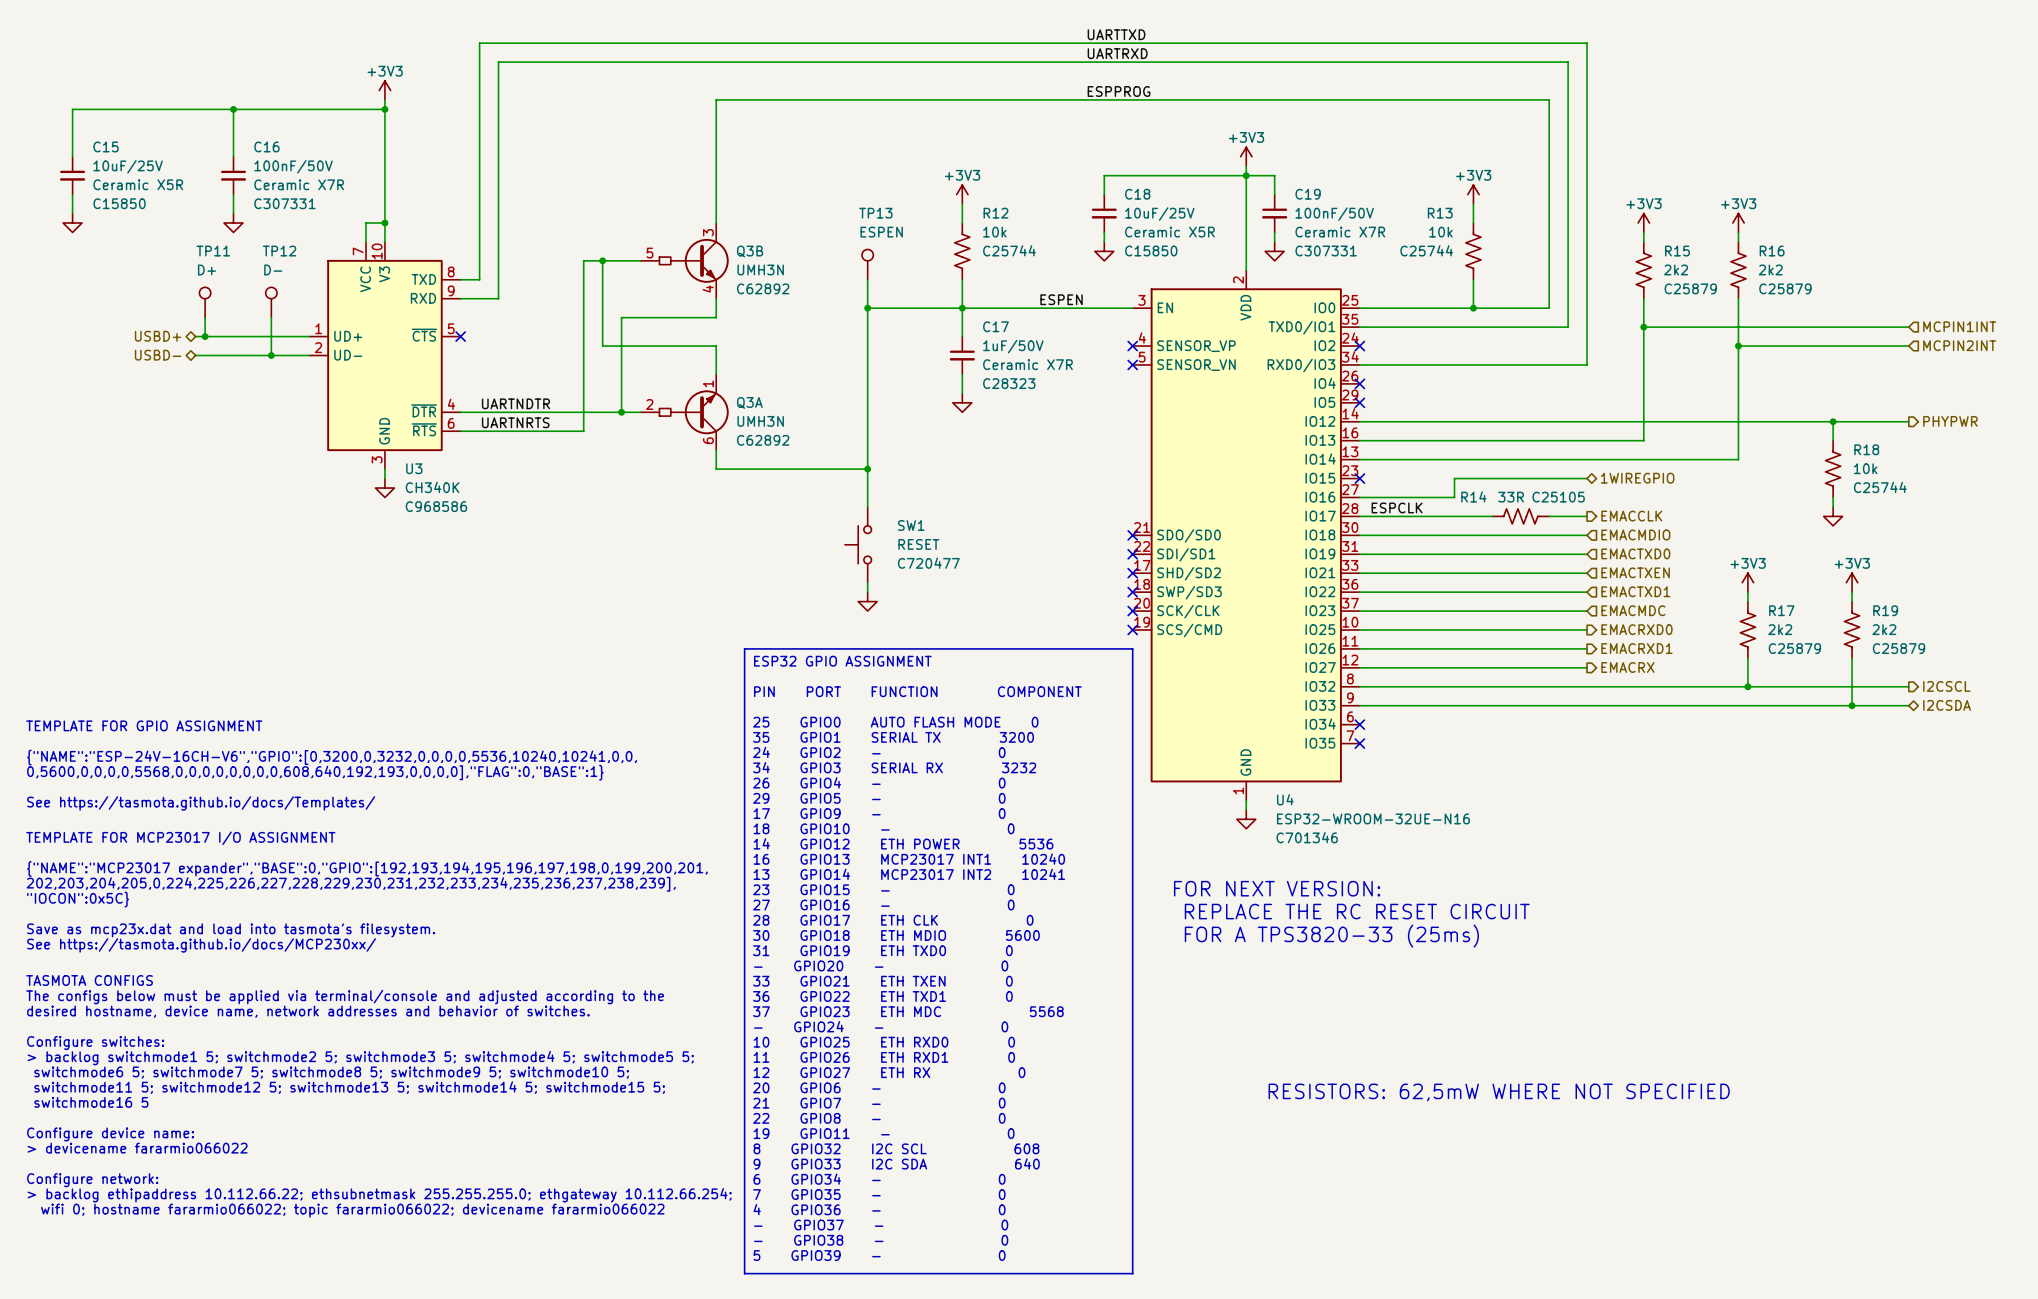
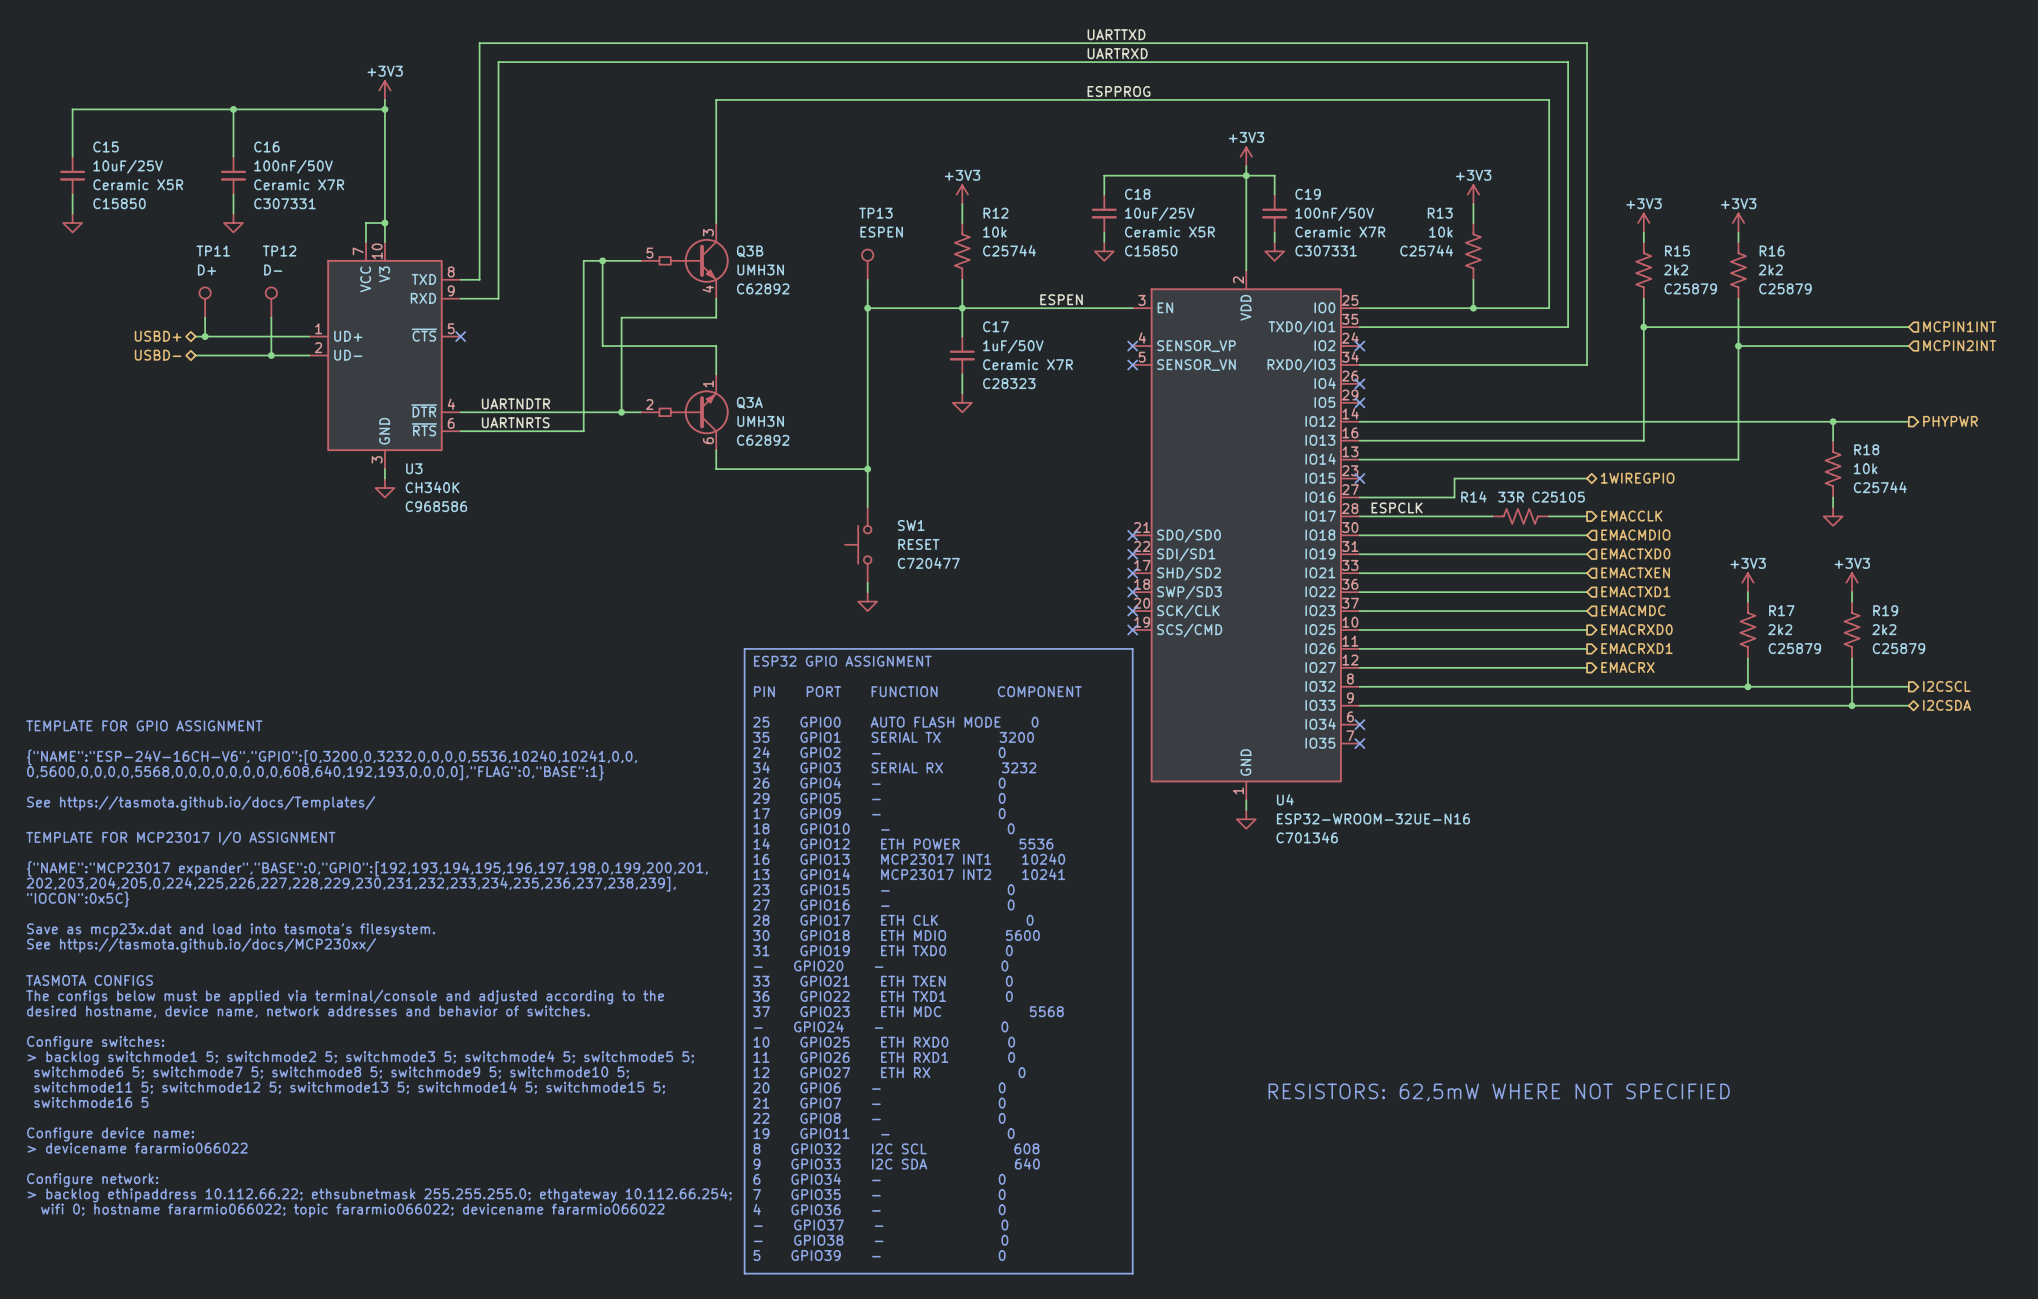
text: FOR NEXT VERSION: (1277, 888) -> none
text: REPLACE THE RC RESET CIRCUIT (1357, 911) -> none
text: FOR A TPS3820-33 (25ms) (1331, 936) -> none

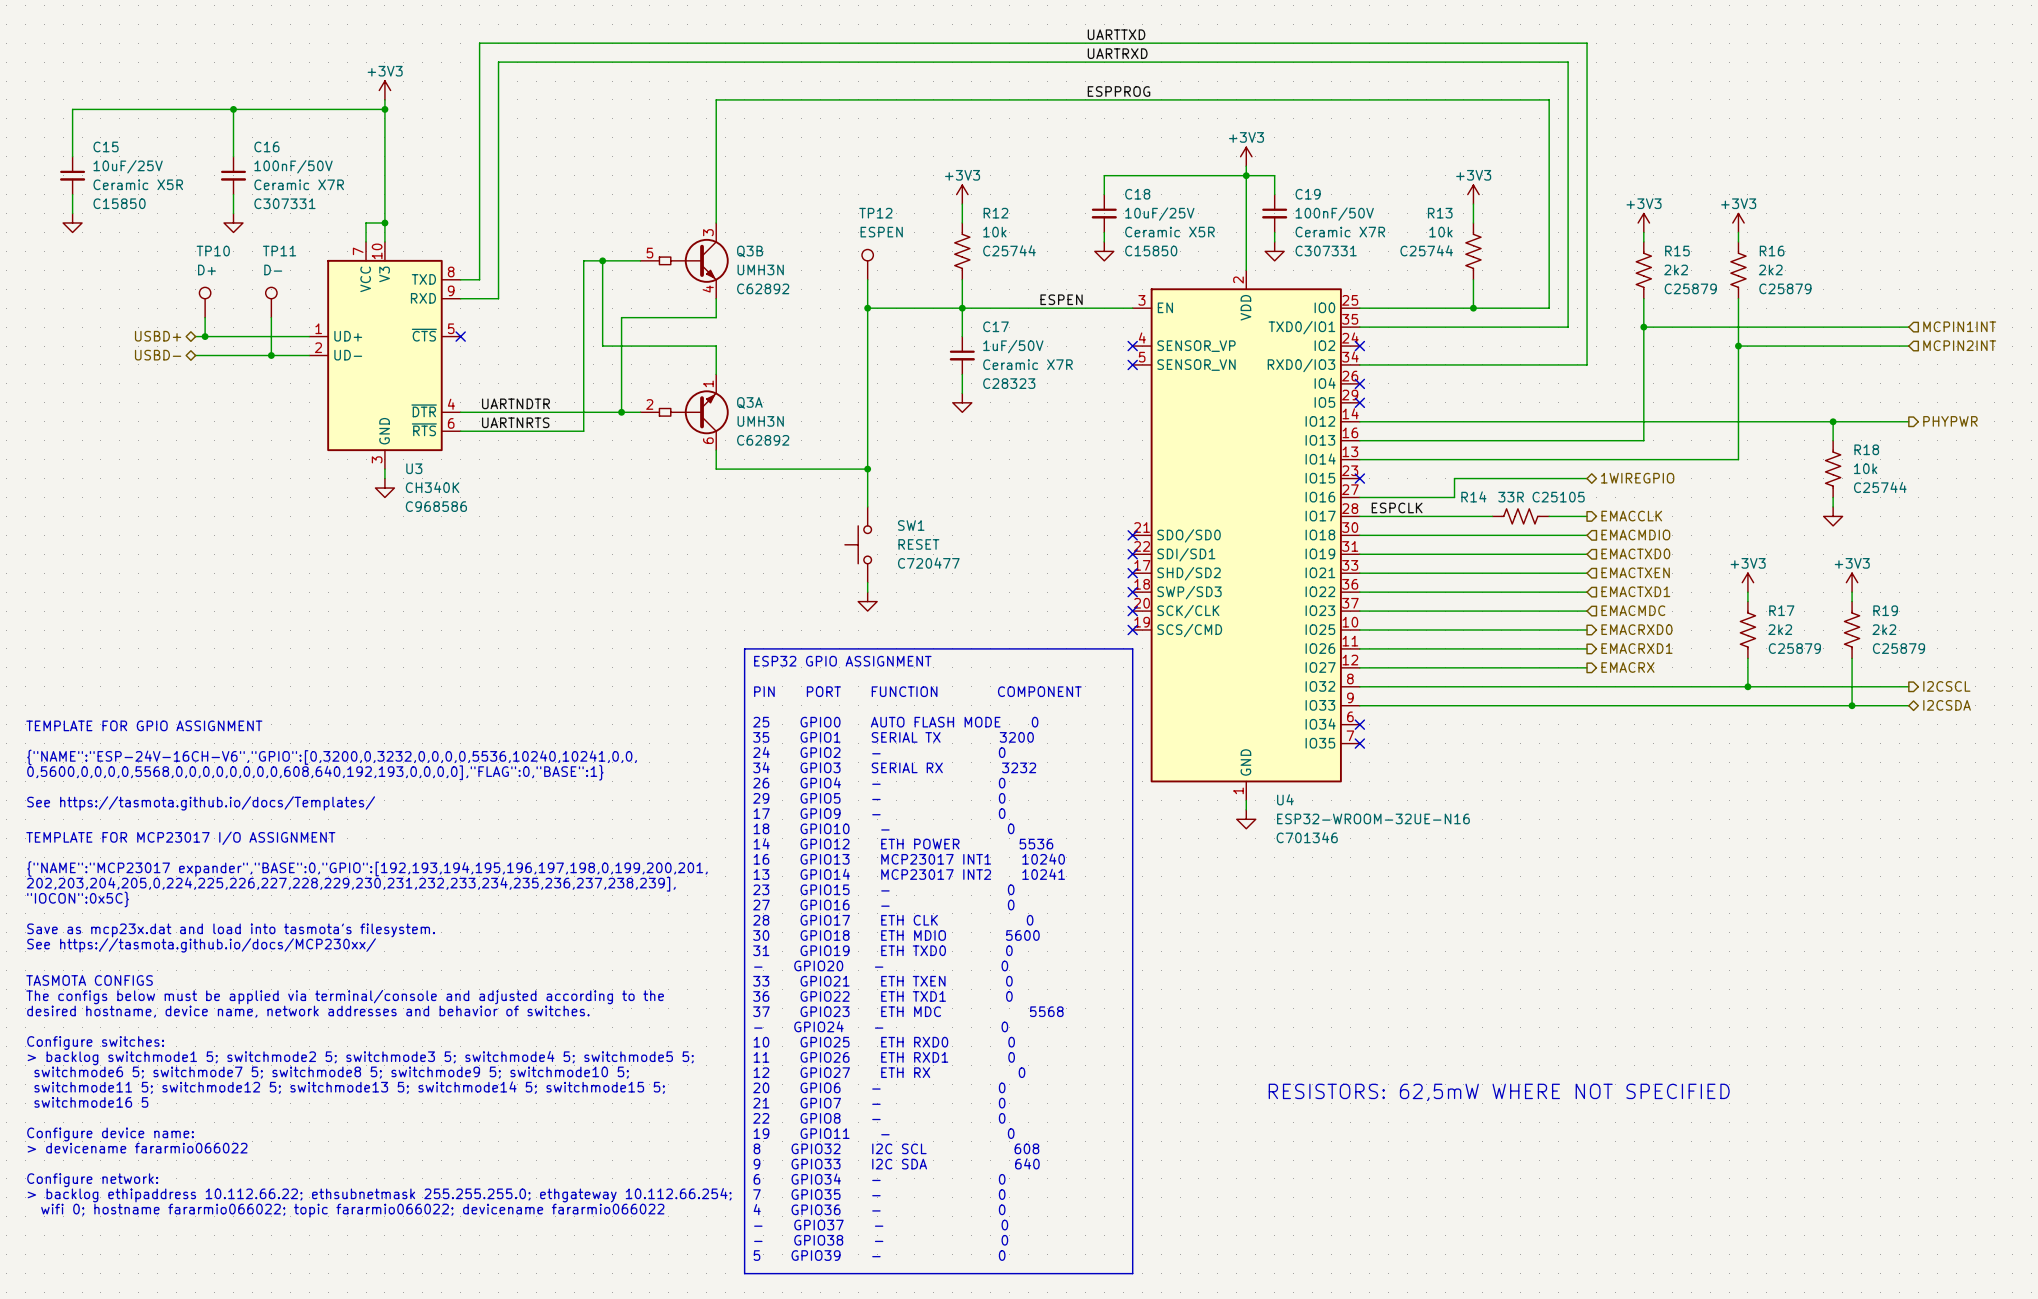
TP13 name: TP13 (875, 213) -> TP12 (875, 213)
TP11 name: TP11 (213, 251) -> TP10 (213, 251)
TP12 name: TP12 (279, 251) -> TP11 (279, 251)

